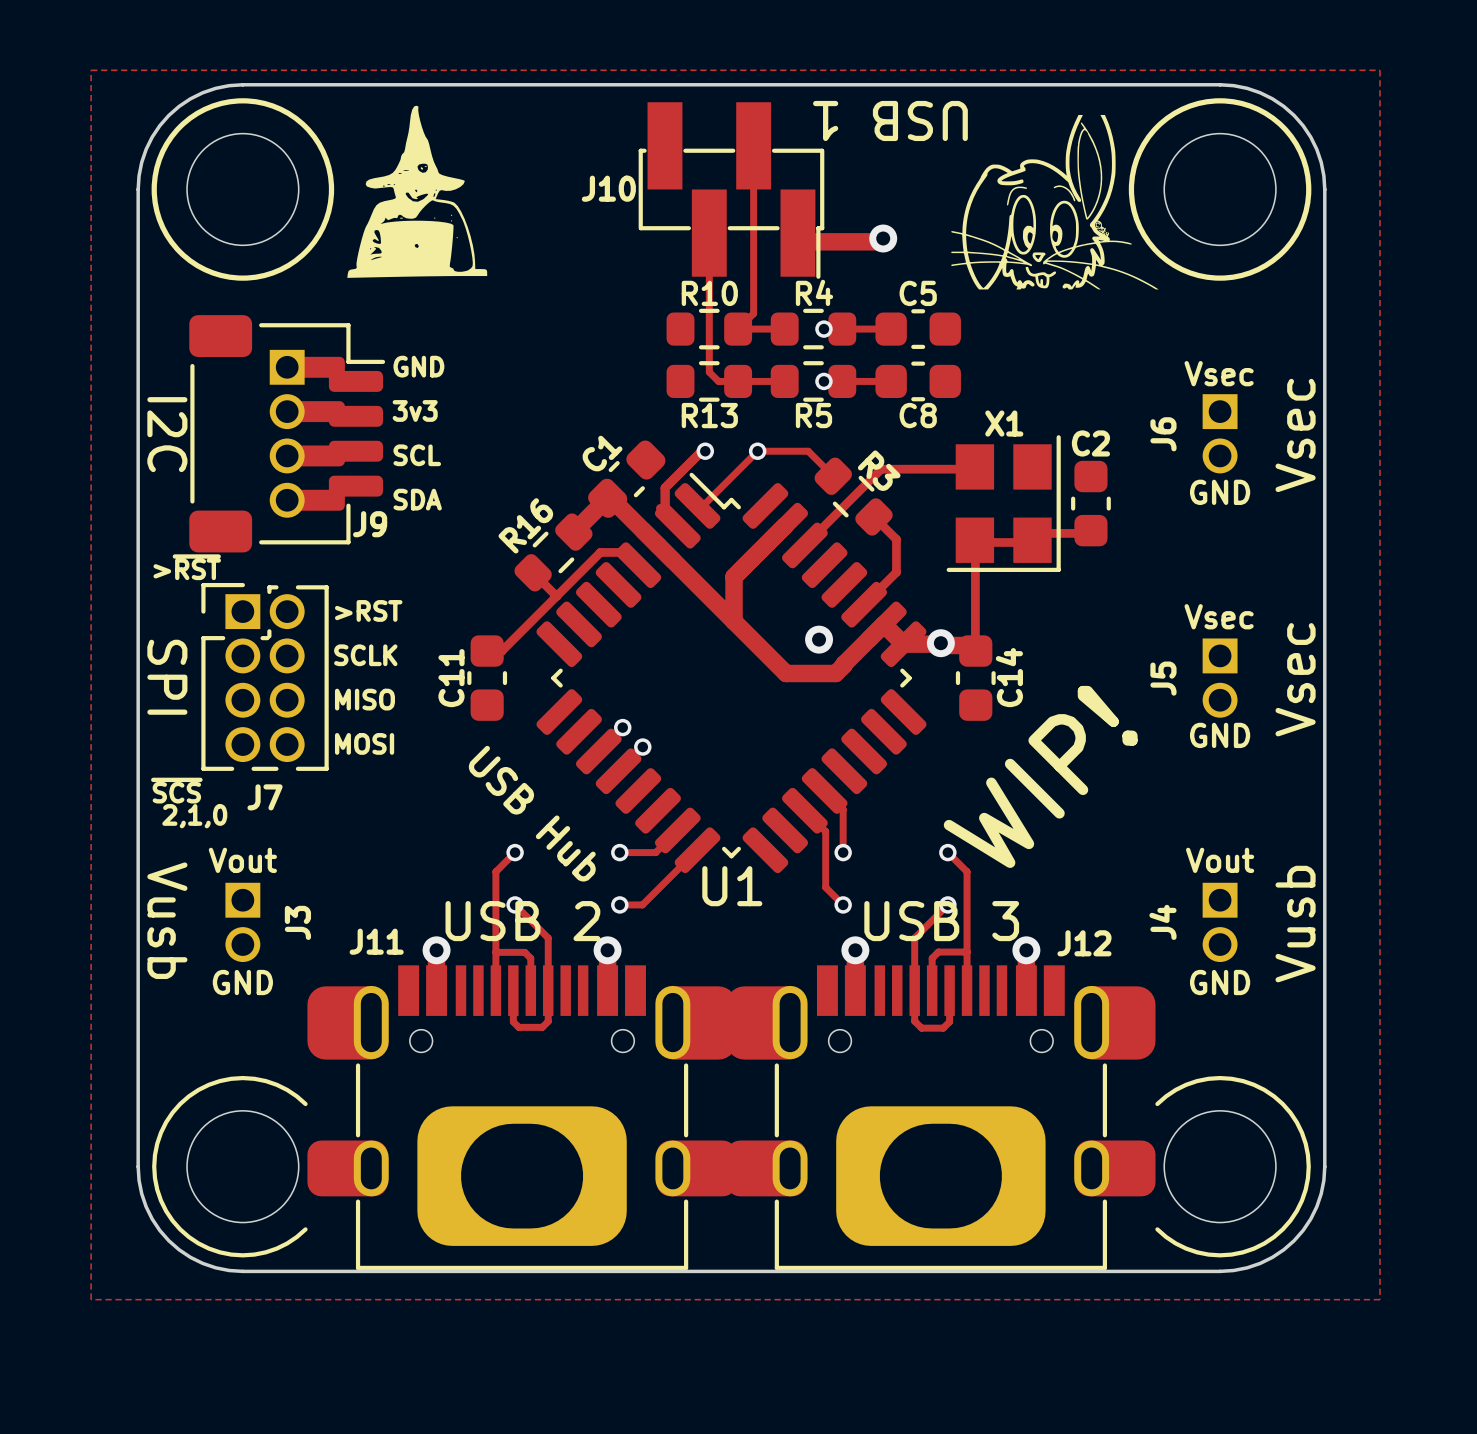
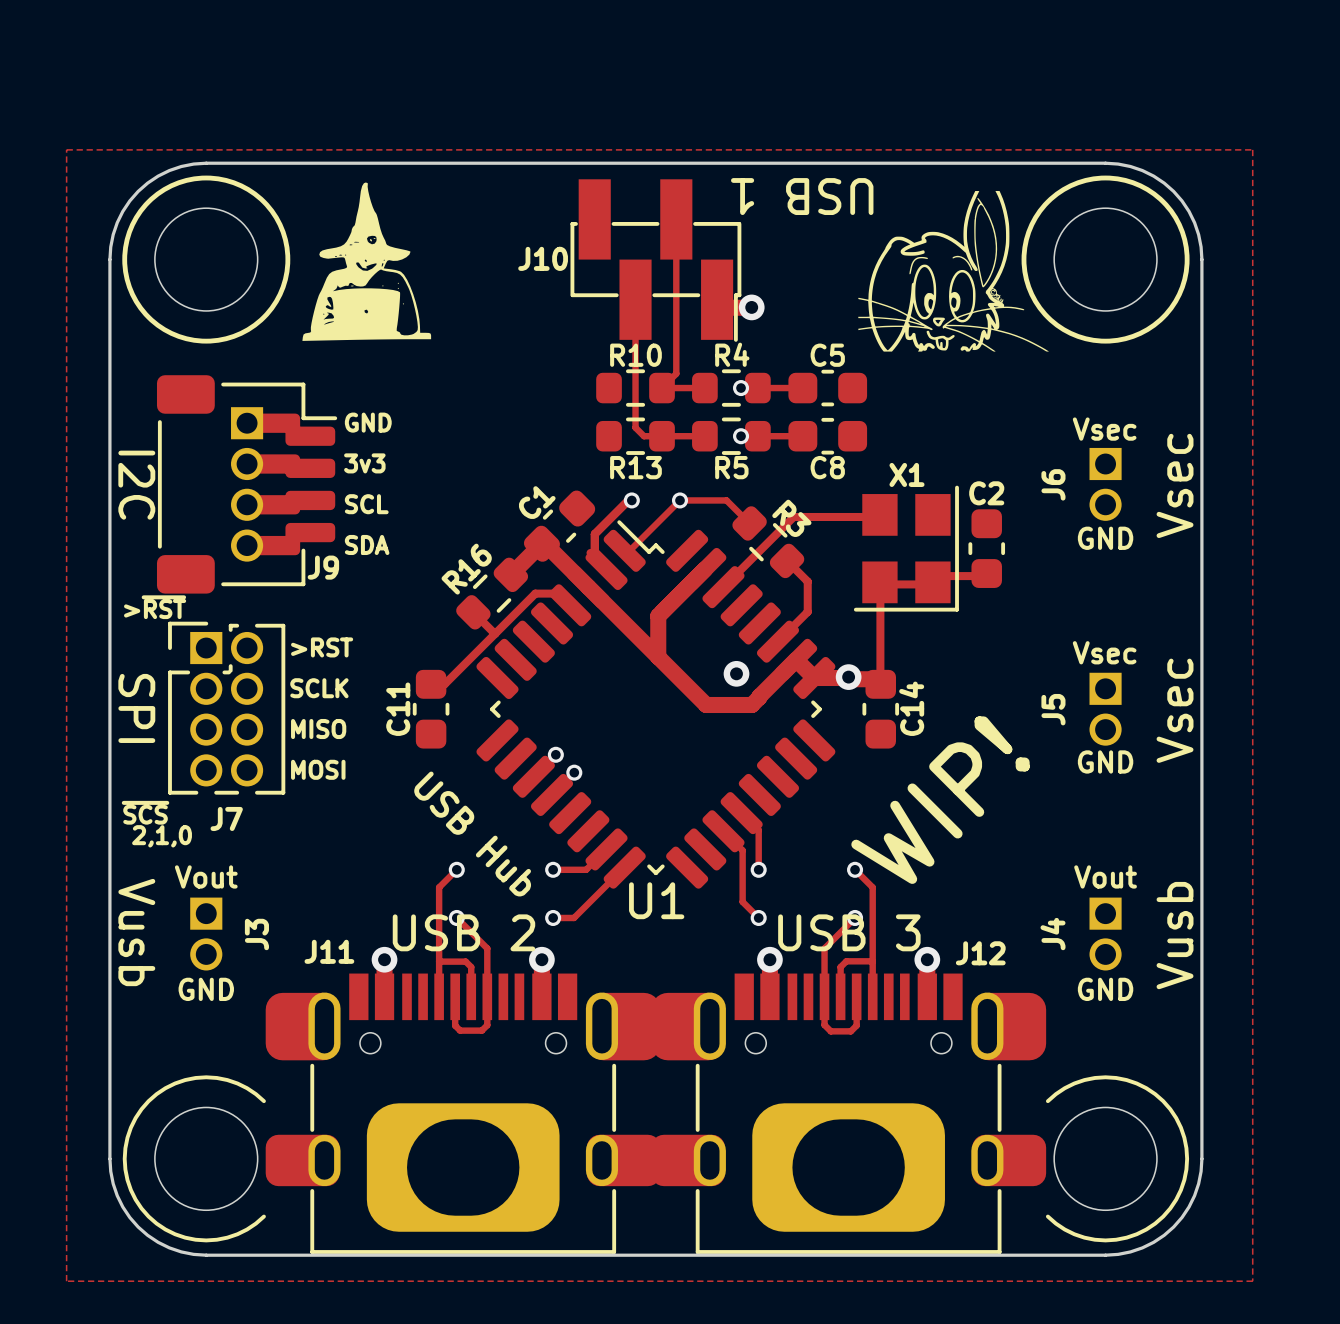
track: (883, 238) (879, 241) (835, 241) -> none
via position: (883, 238) -> (751, 307)

